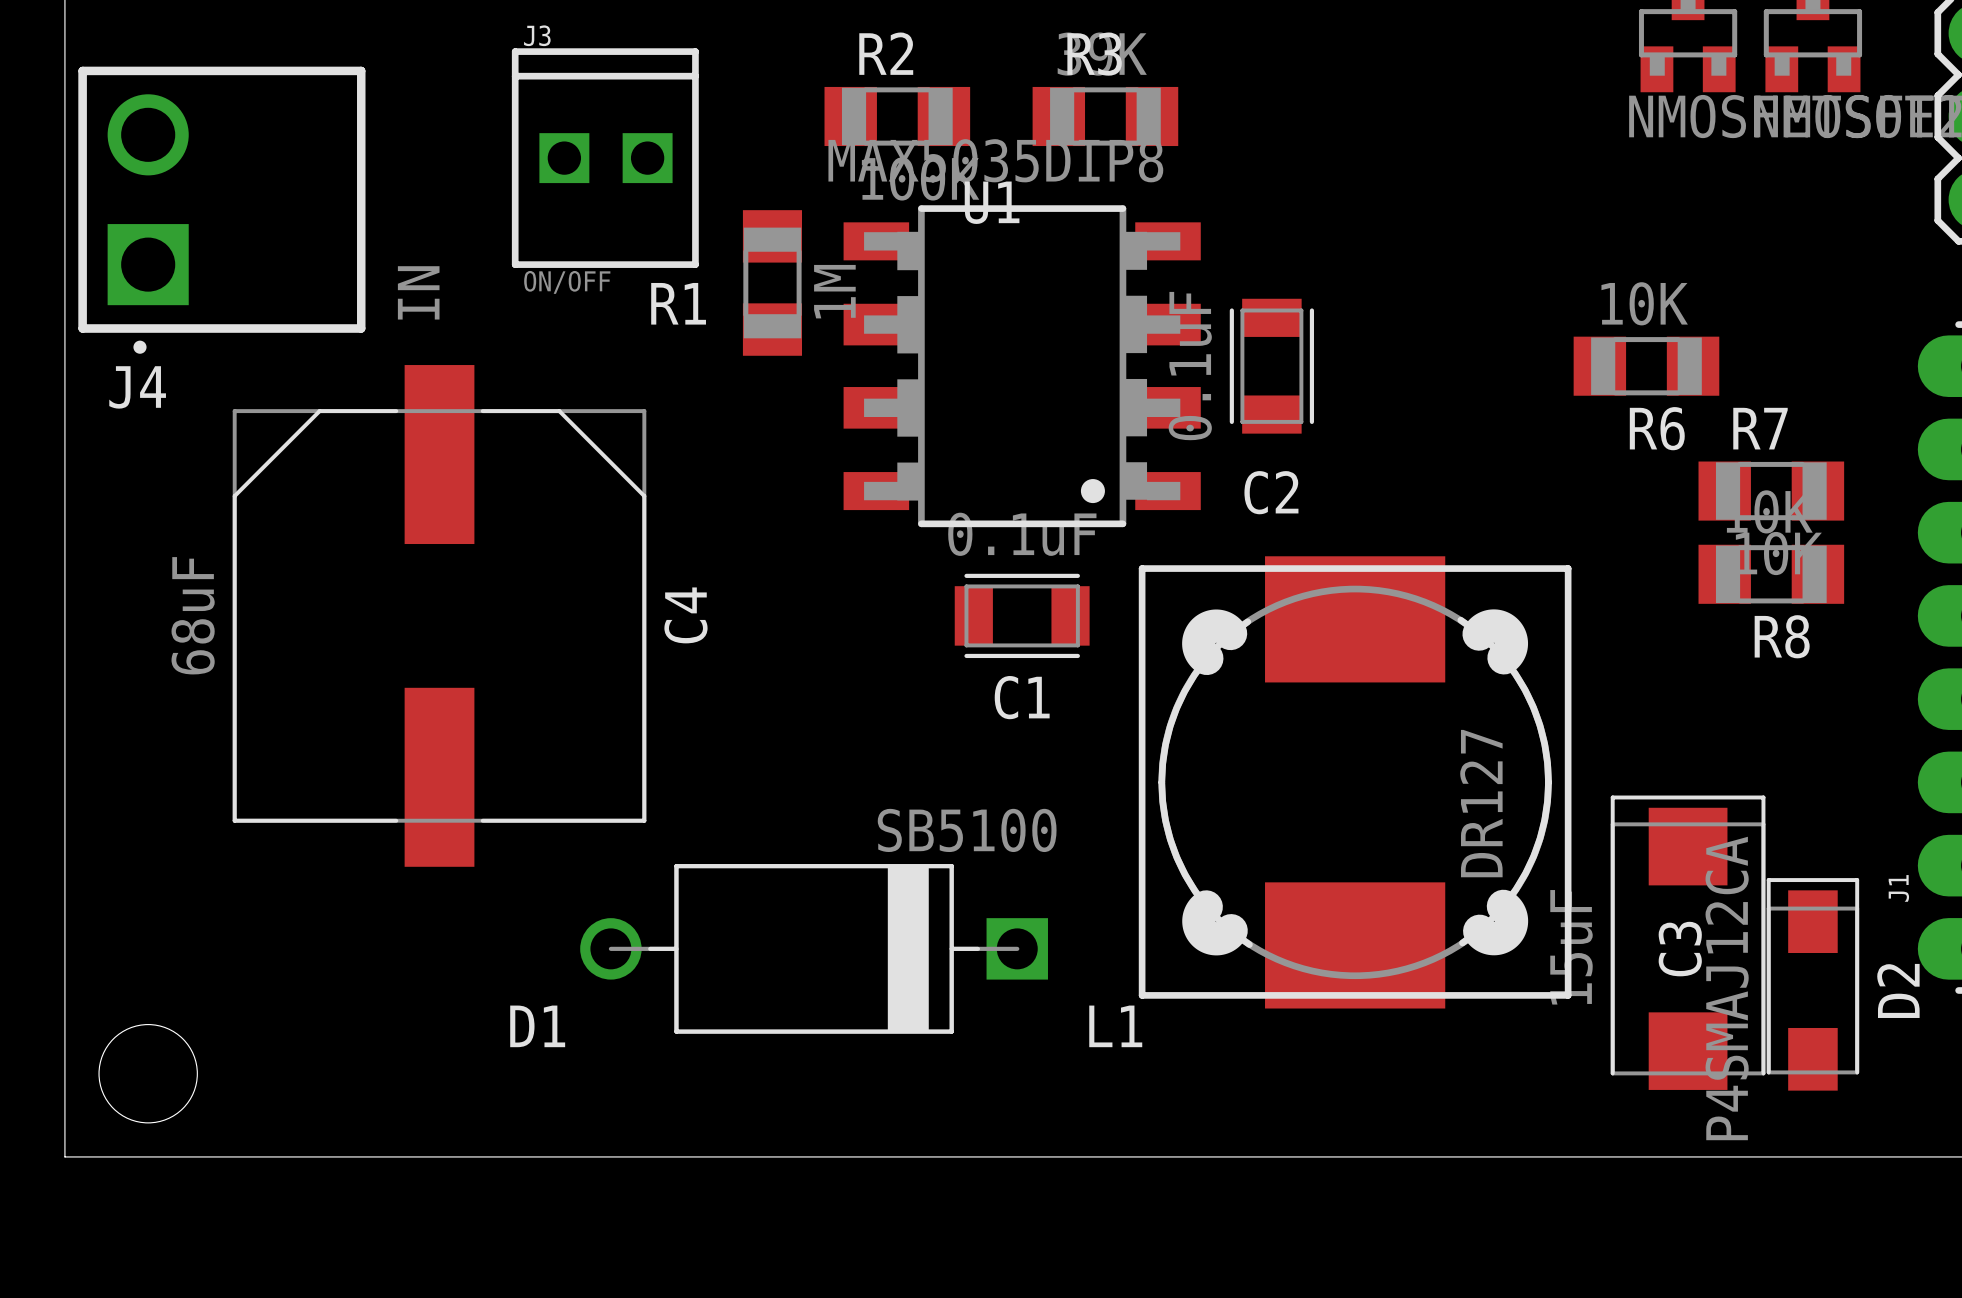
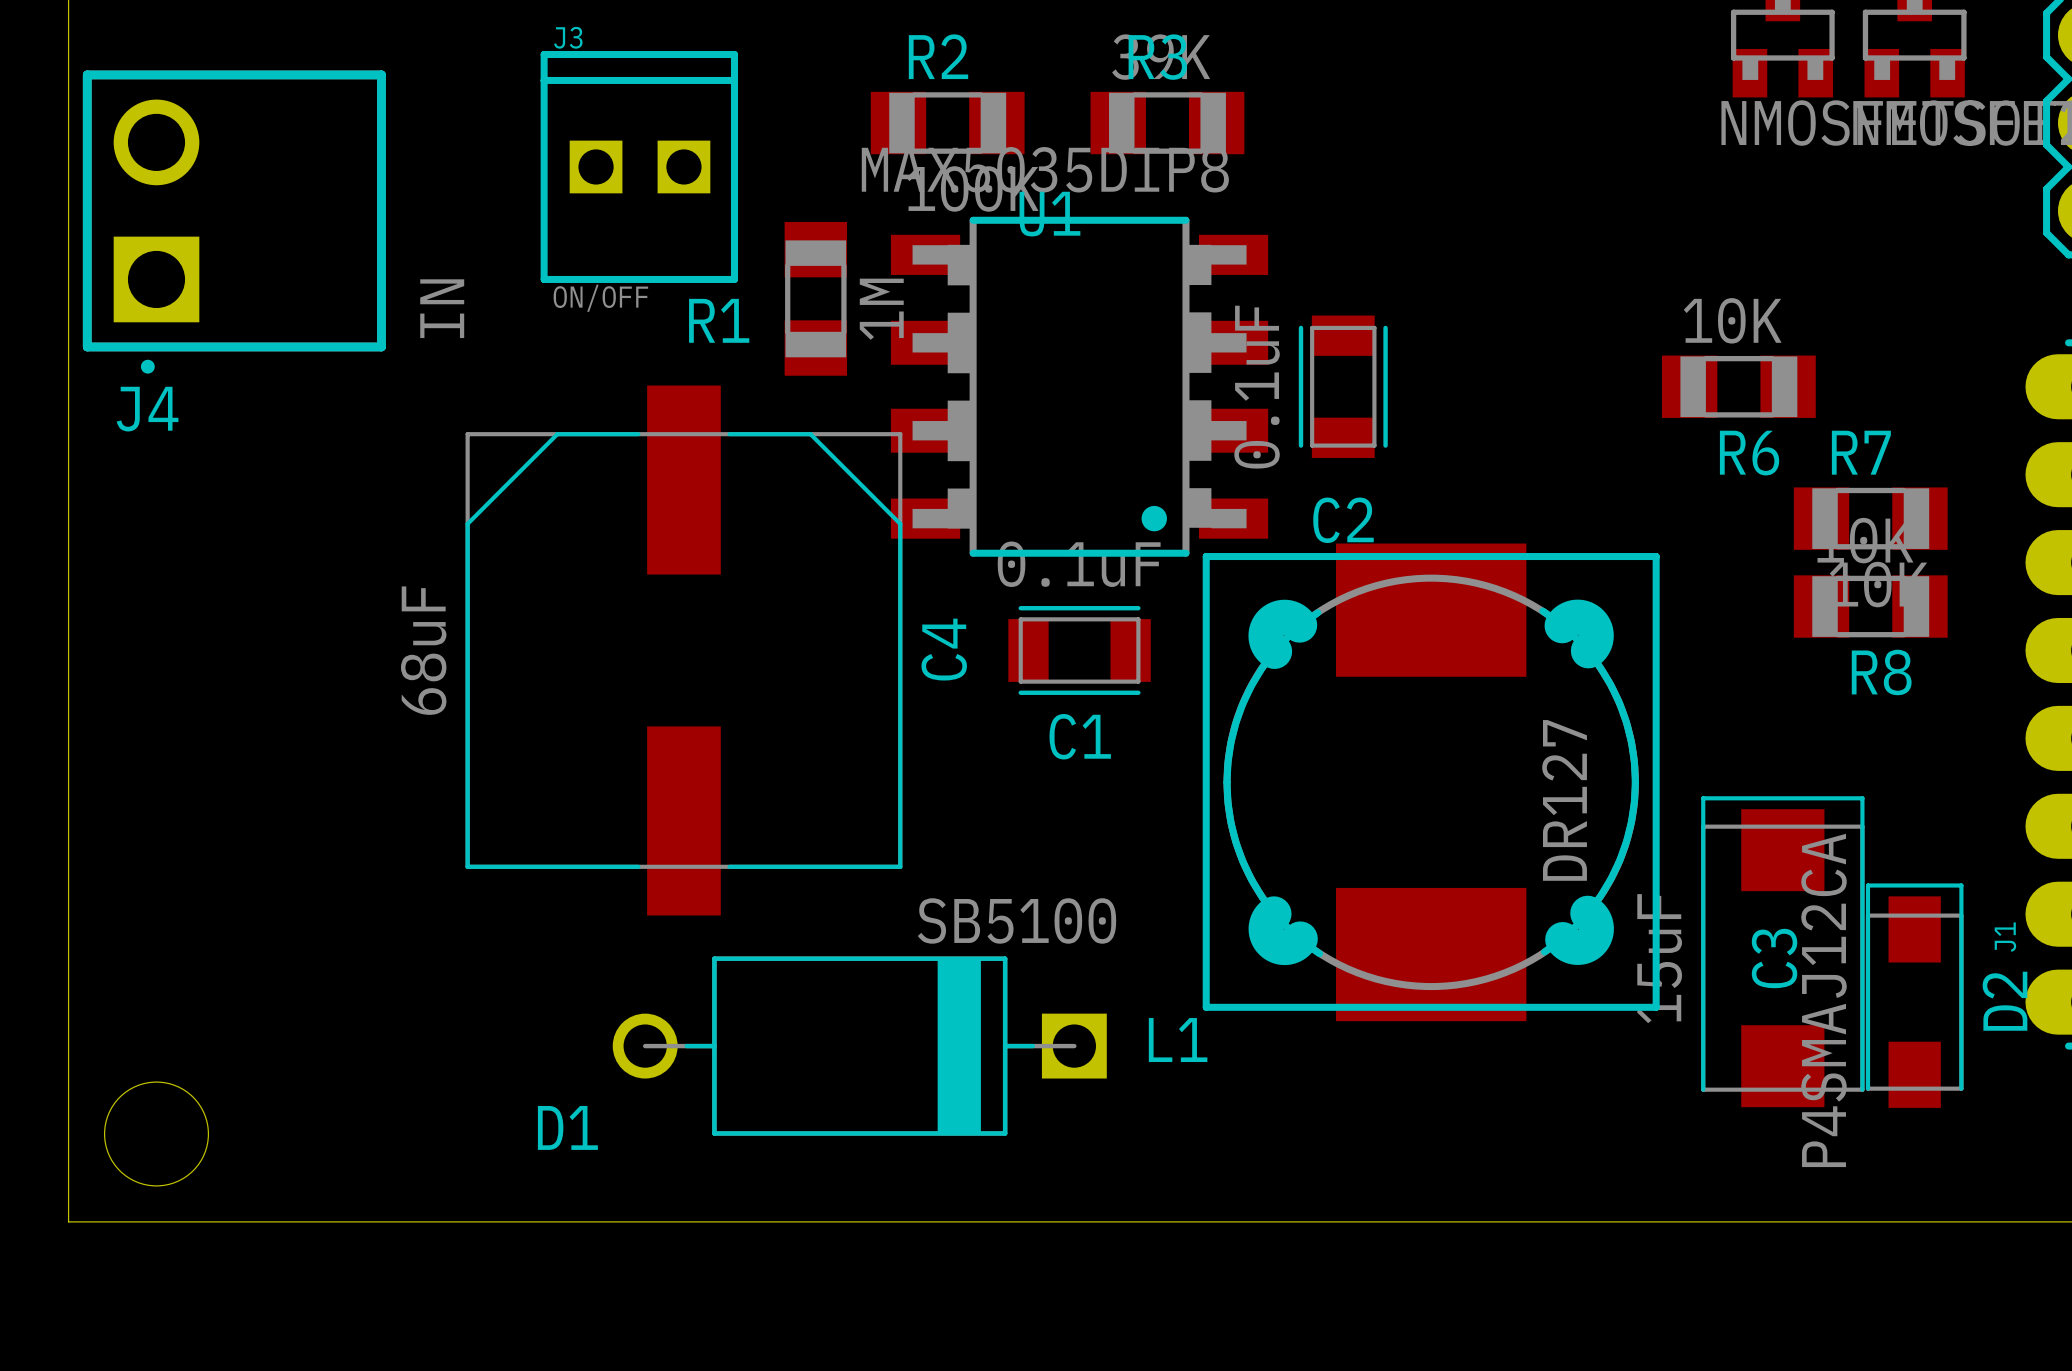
C4 position: (439, 615) -> (683, 650)
L1 position: (1355, 782) -> (1431, 782)
C3 position: (1688, 942) -> (1782, 951)
D1 position: (814, 948) -> (859, 1046)
D2 position: (1812, 984) -> (1914, 995)

